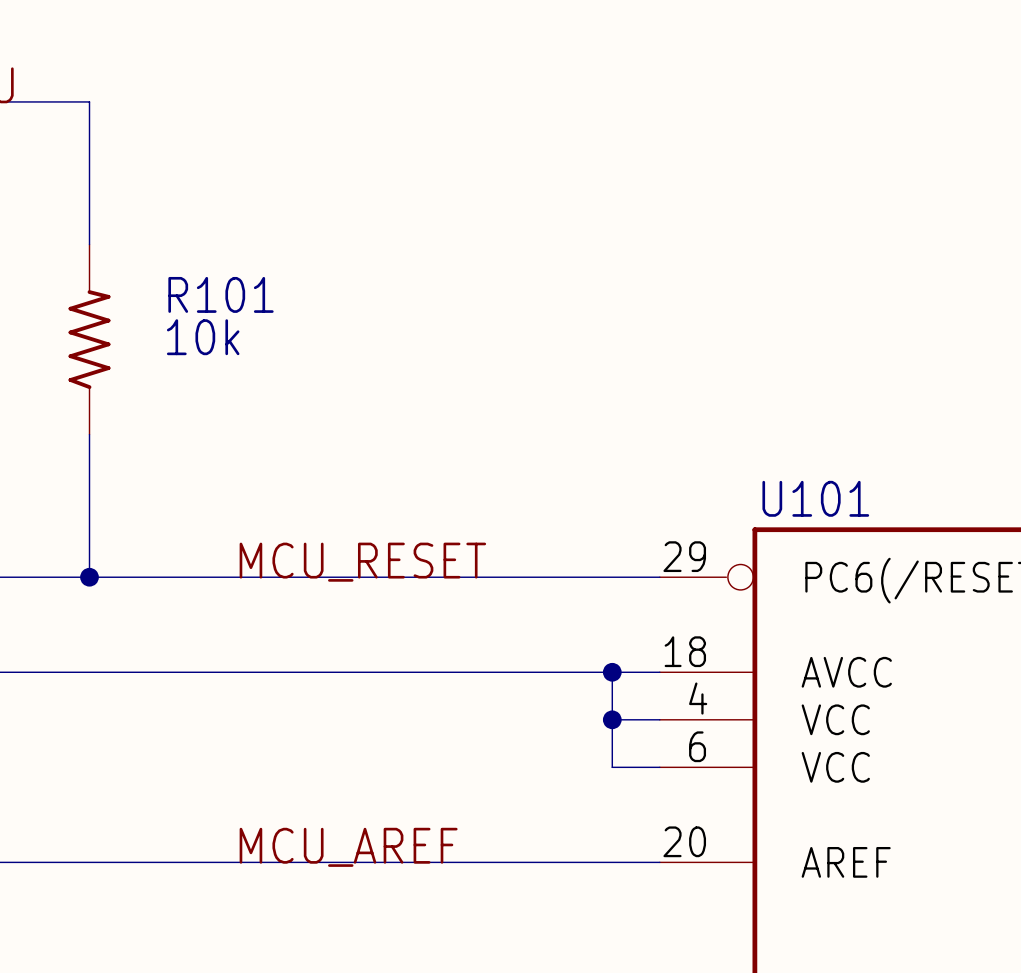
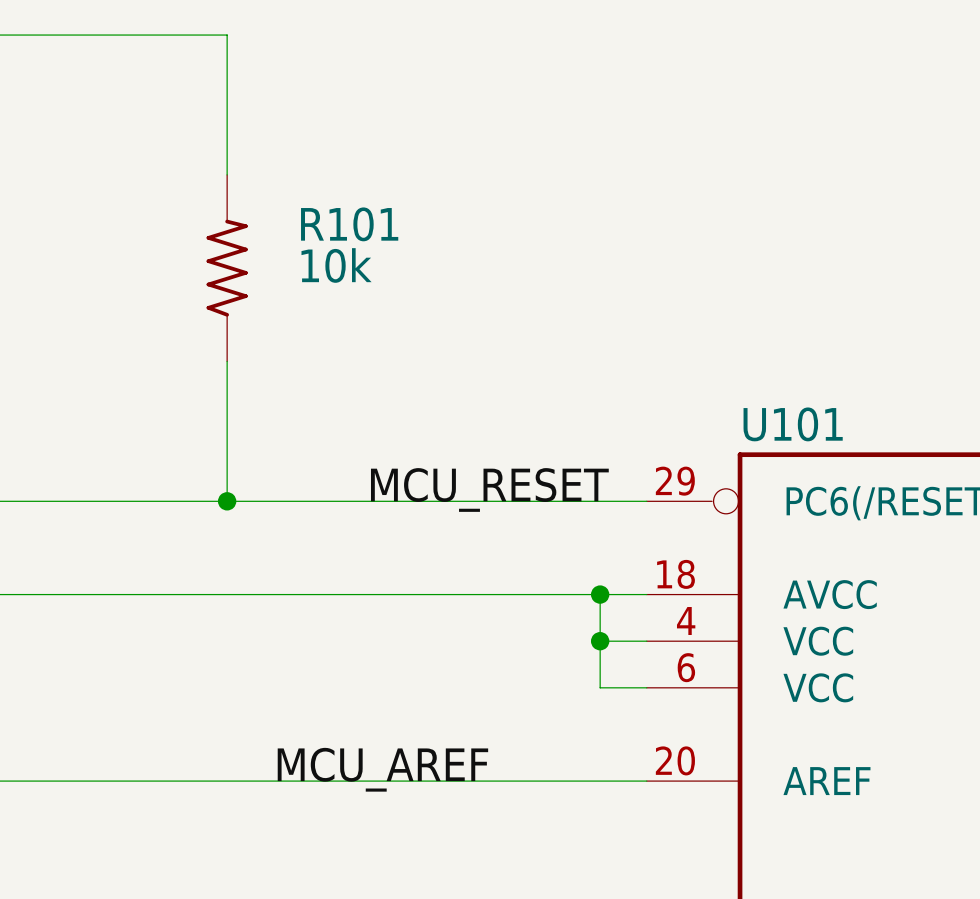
wire: (89, 101) (89, 244) -> (87, 35) (227, 35) (227, 174)
R101 position: (89, 339) -> (227, 268)
wire: (89, 434) (89, 577) -> (227, 361) (227, 501)
label position: MCU_RESET (362, 562) -> MCU_RESET (489, 489)
junction: (89, 577) -> none
junction: none -> (227, 501)
label position: MCU_AREF (348, 847) -> MCU_AREF (382, 769)

